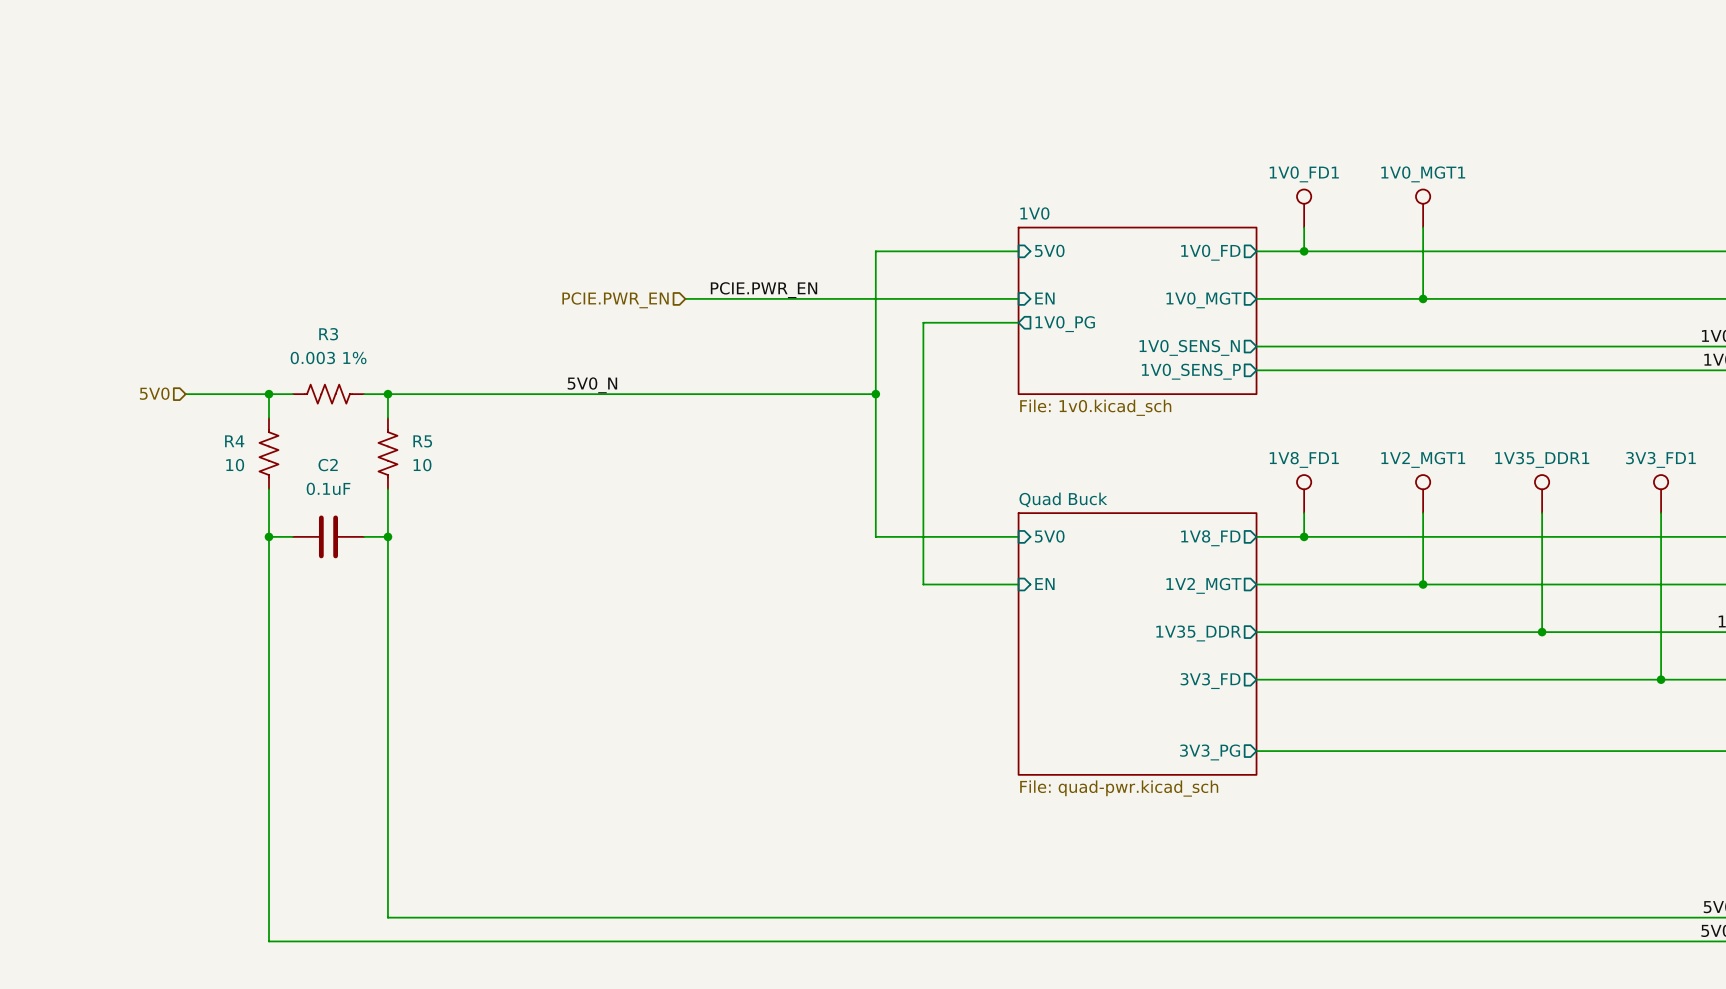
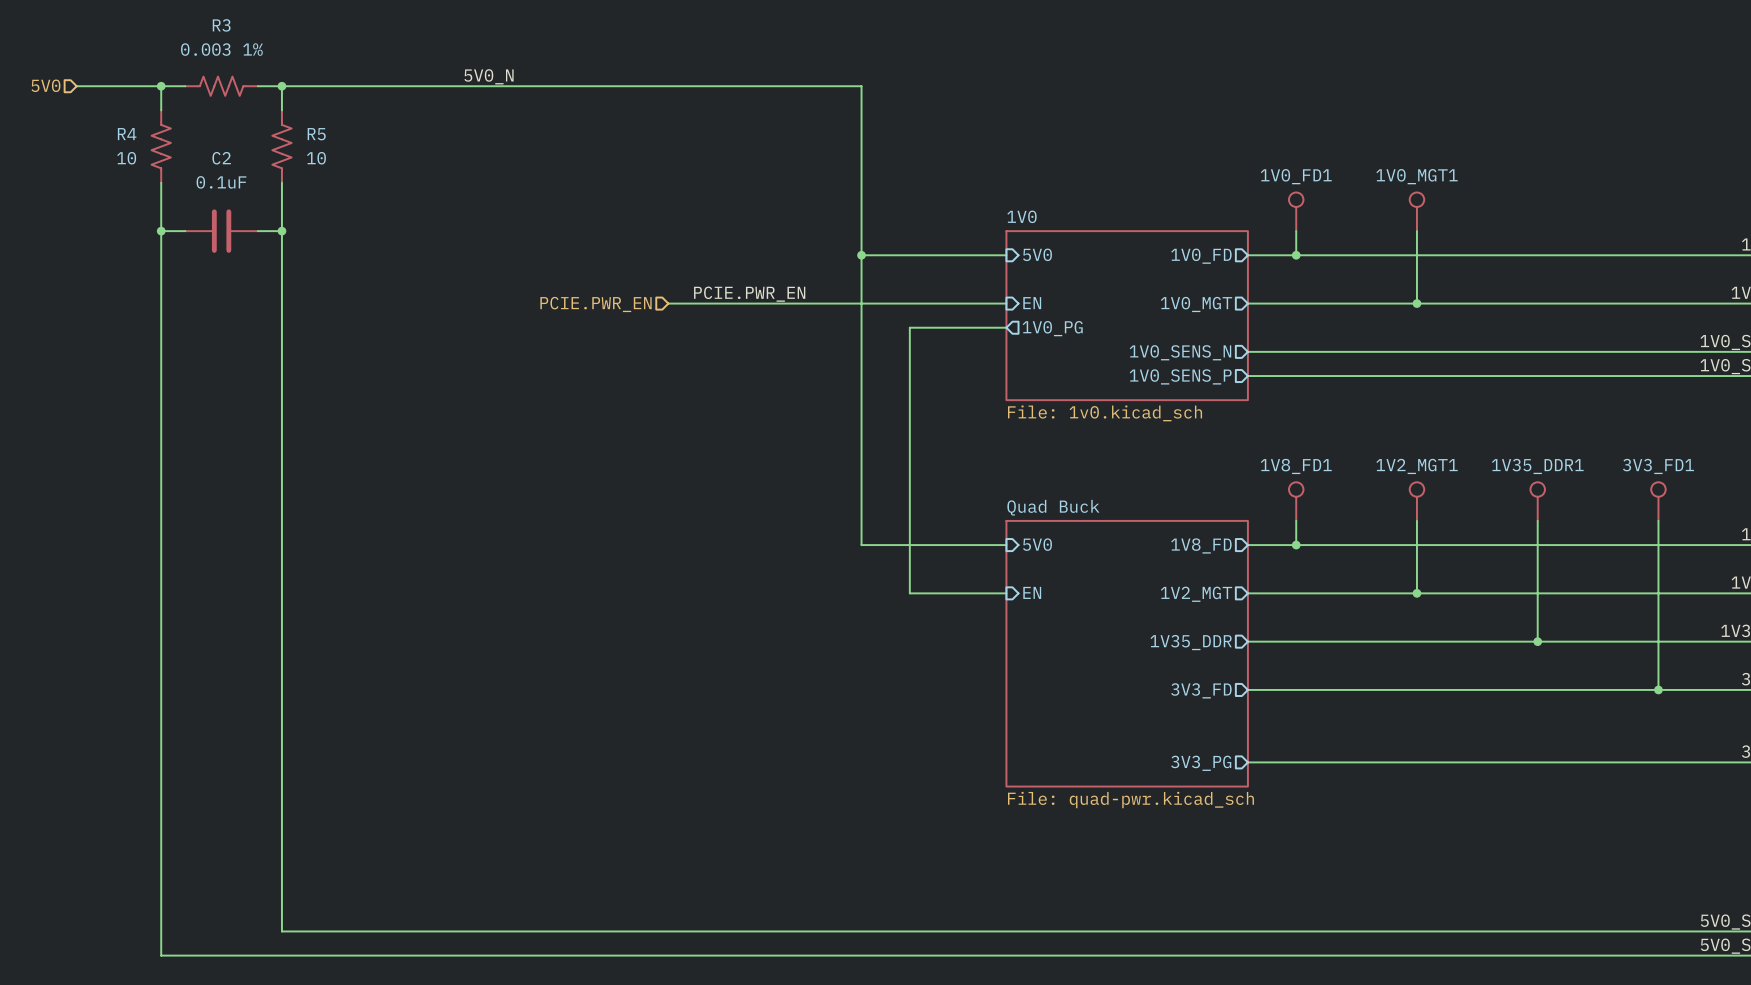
label: none -> 5V0_N (488, 76)
hierarchical label: none -> 5V0 (45, 85)
wire: none -> (76, 86) (185, 86)
wire: none -> (161, 86) (161, 110)
junction: none -> (161, 86)
wire: none -> (257, 86) (861, 86) (861, 255)
wire: none -> (281, 86) (281, 110)
junction: none -> (281, 86)
wire: none -> (161, 231) (185, 231)
junction: none -> (161, 231)
wire: none -> (257, 231) (281, 231)
junction: none -> (281, 231)
junction: none -> (861, 255)
label: 5V0_N (592, 385) -> none
hierarchical label: 5V0 (154, 393) -> none
wire: (185, 394) (292, 394) -> none
wire: (268, 394) (268, 417) -> none
junction: (268, 394) -> none
R3 position: (328, 394) -> (221, 86)
wire: (364, 394) (875, 394) -> none
wire: (387, 394) (387, 417) -> none
junction: (387, 394) -> none
junction: (875, 394) -> none
R4 position: (268, 453) -> (161, 146)
R5 position: (387, 453) -> (281, 146)
wire: (268, 489) (268, 941) -> (161, 182) (161, 955) (245, 955)
wire: (387, 489) (387, 917) -> (281, 182) (281, 931) (366, 931)
wire: (268, 536) (292, 536) -> none
junction: (268, 536) -> none
C2 position: (328, 536) -> (221, 231)
wire: (364, 536) (387, 536) -> none
junction: (387, 536) -> none

